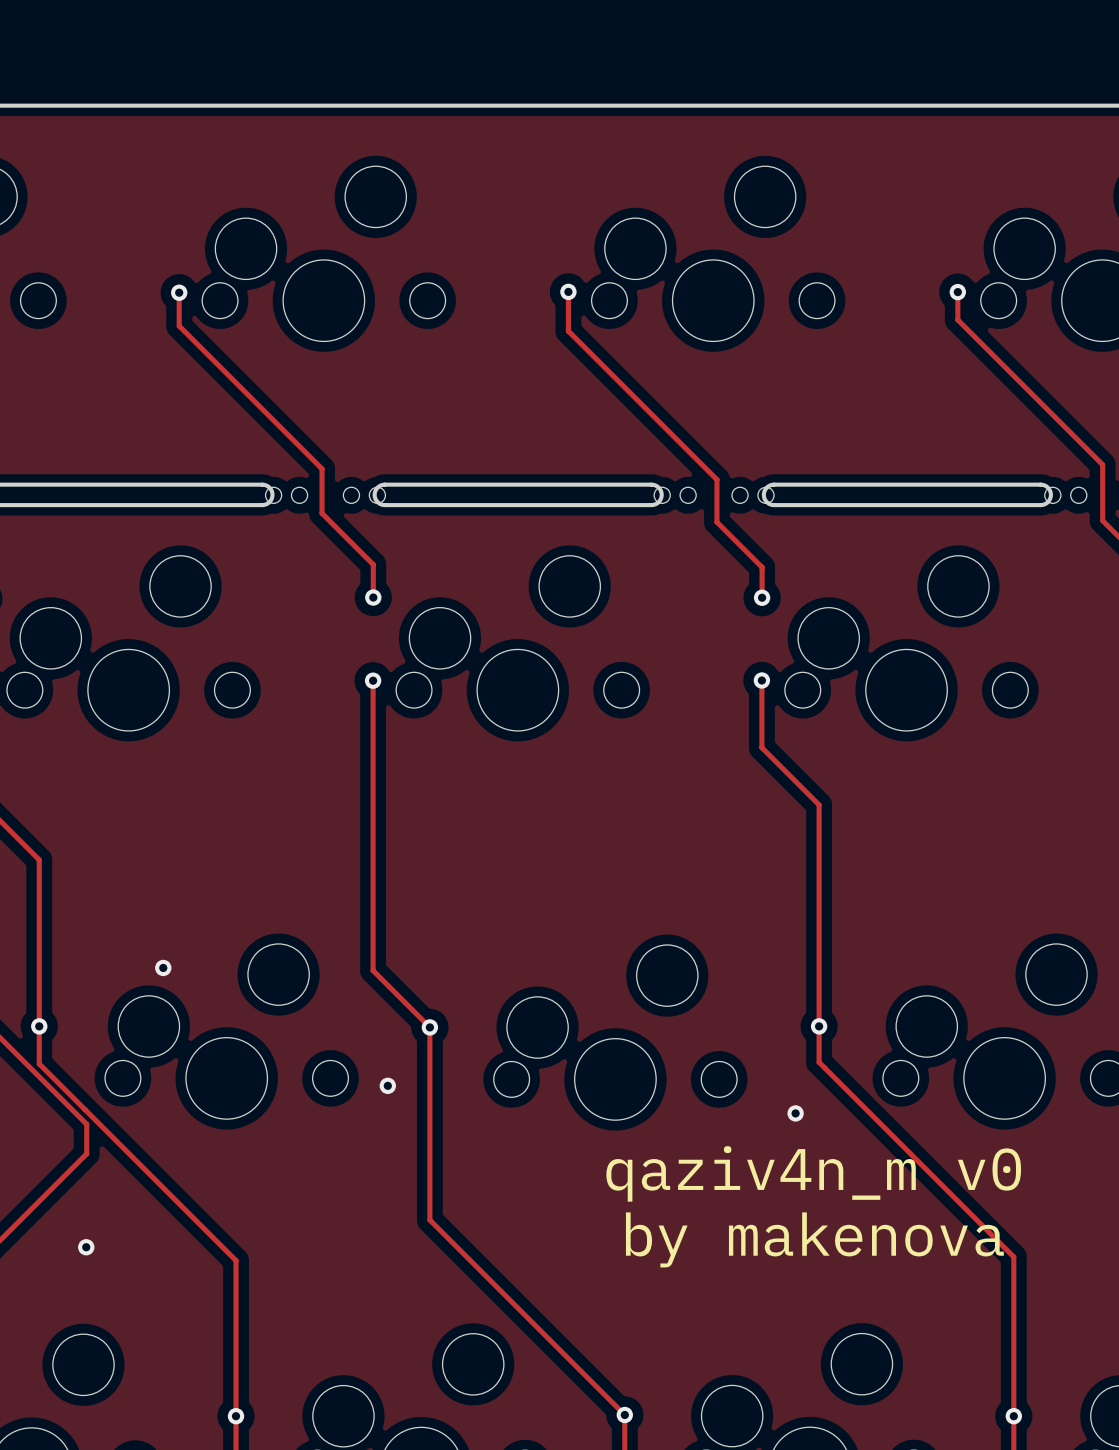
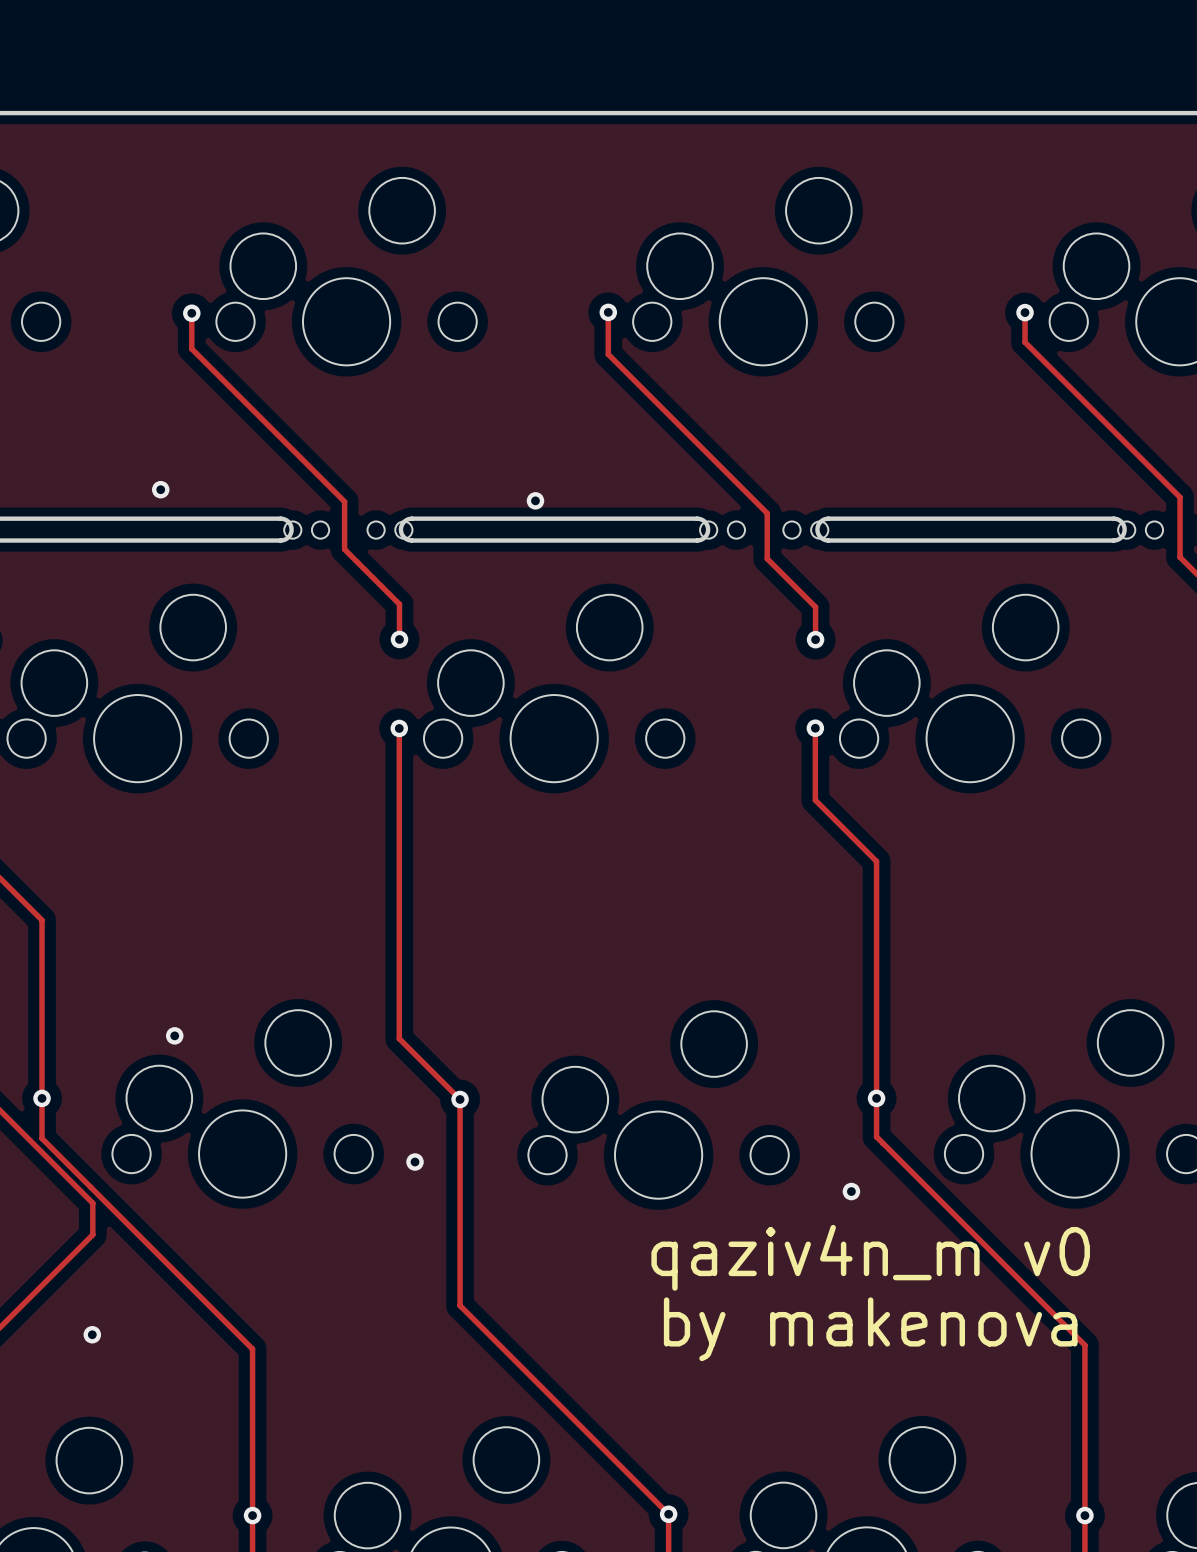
via: none -> (160, 489)
via: none -> (535, 500)

